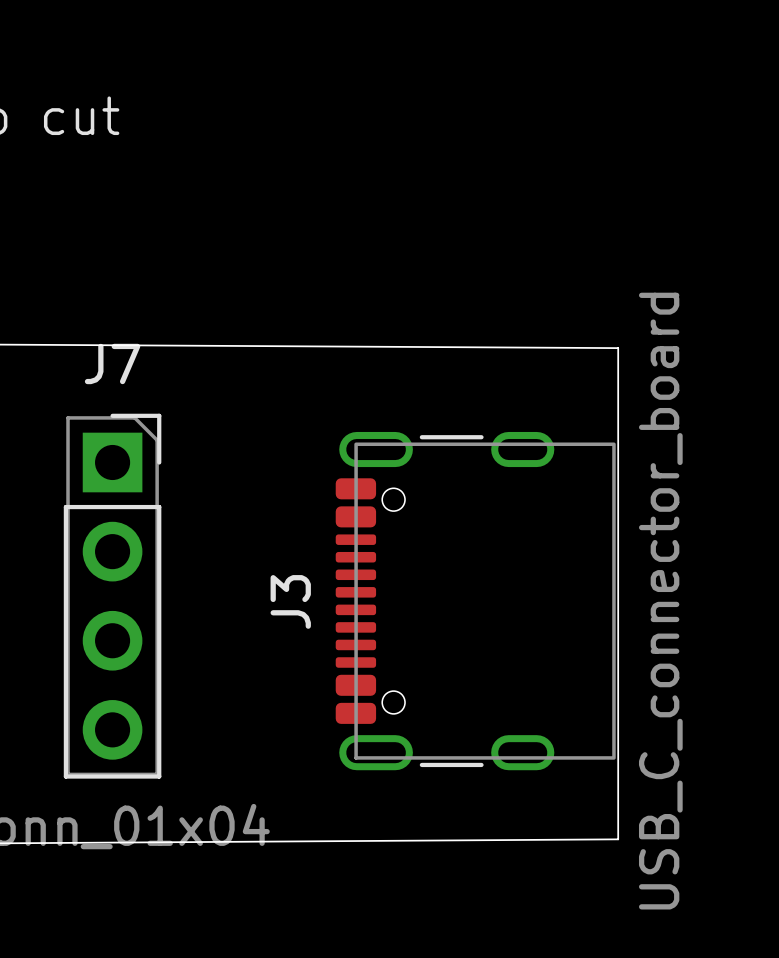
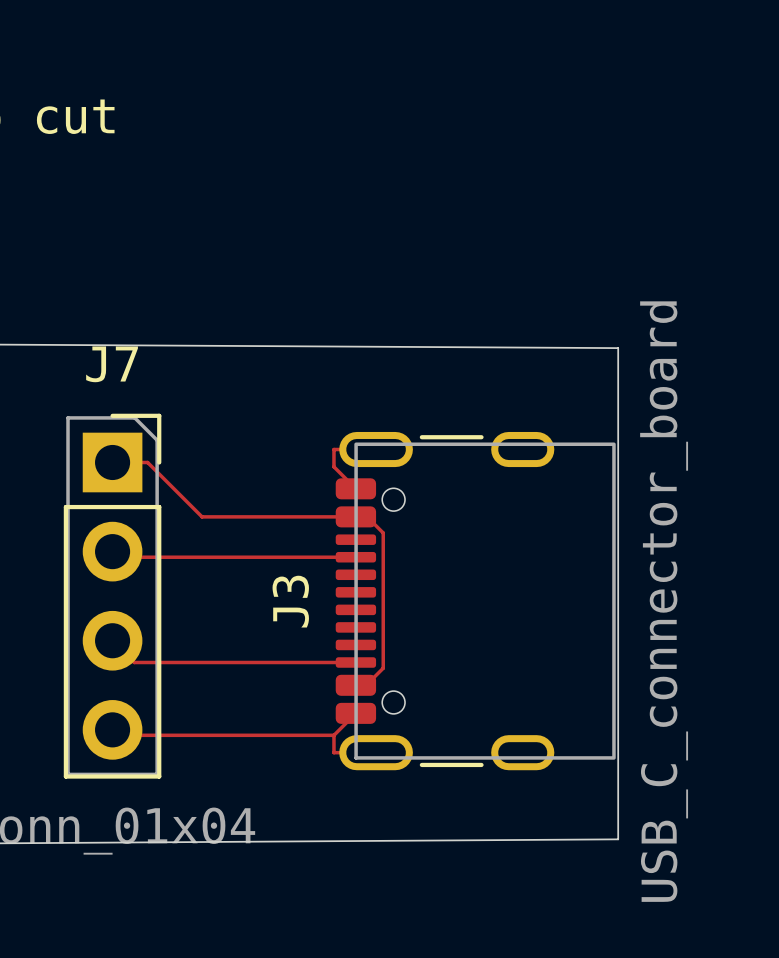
track: none -> (376, 449) (333, 449) (333, 466) (355, 488)
track: none -> (112, 462) (147, 462) (202, 516) (367, 516) (383, 532) (383, 668) (366, 685) (355, 685)
track: none -> (112, 551) (118, 557) (355, 557)
track: none -> (112, 640) (134, 662) (355, 662)
track: none -> (355, 713) (333, 735)
track: none -> (112, 729) (118, 735) (333, 735)
track: none -> (333, 735) (333, 752) (376, 752)

